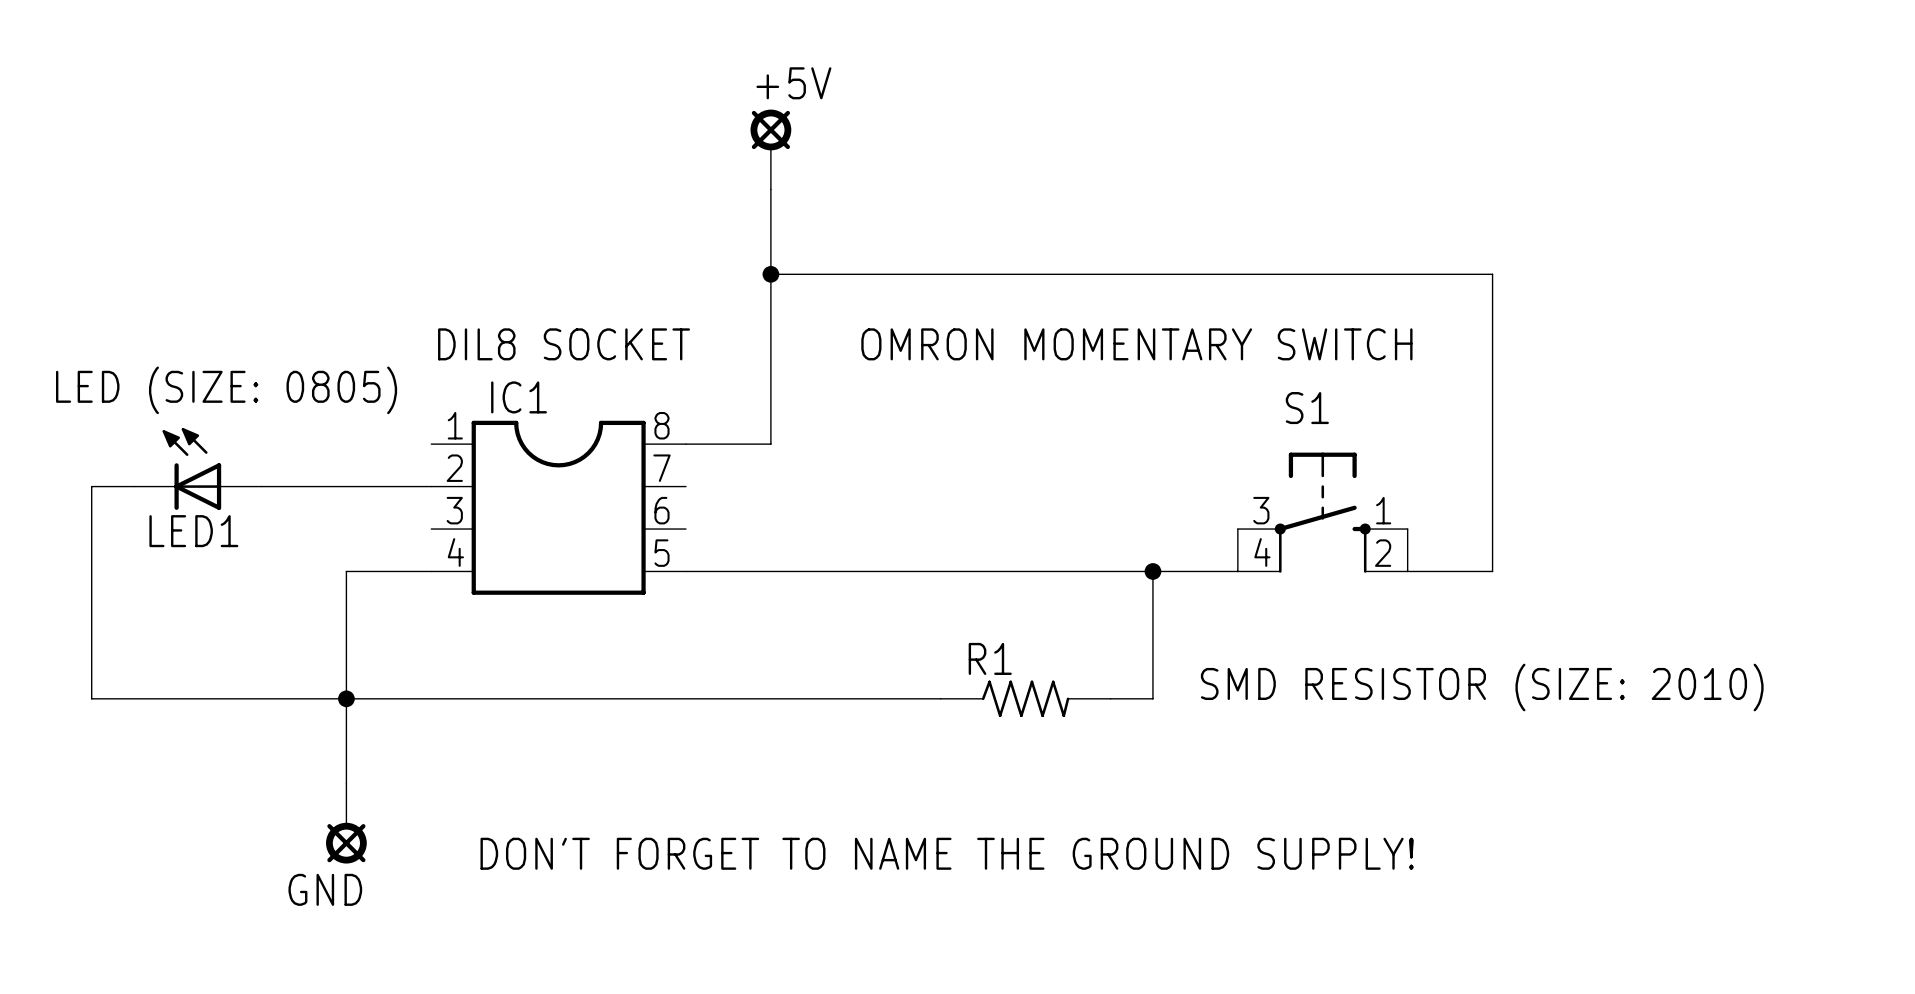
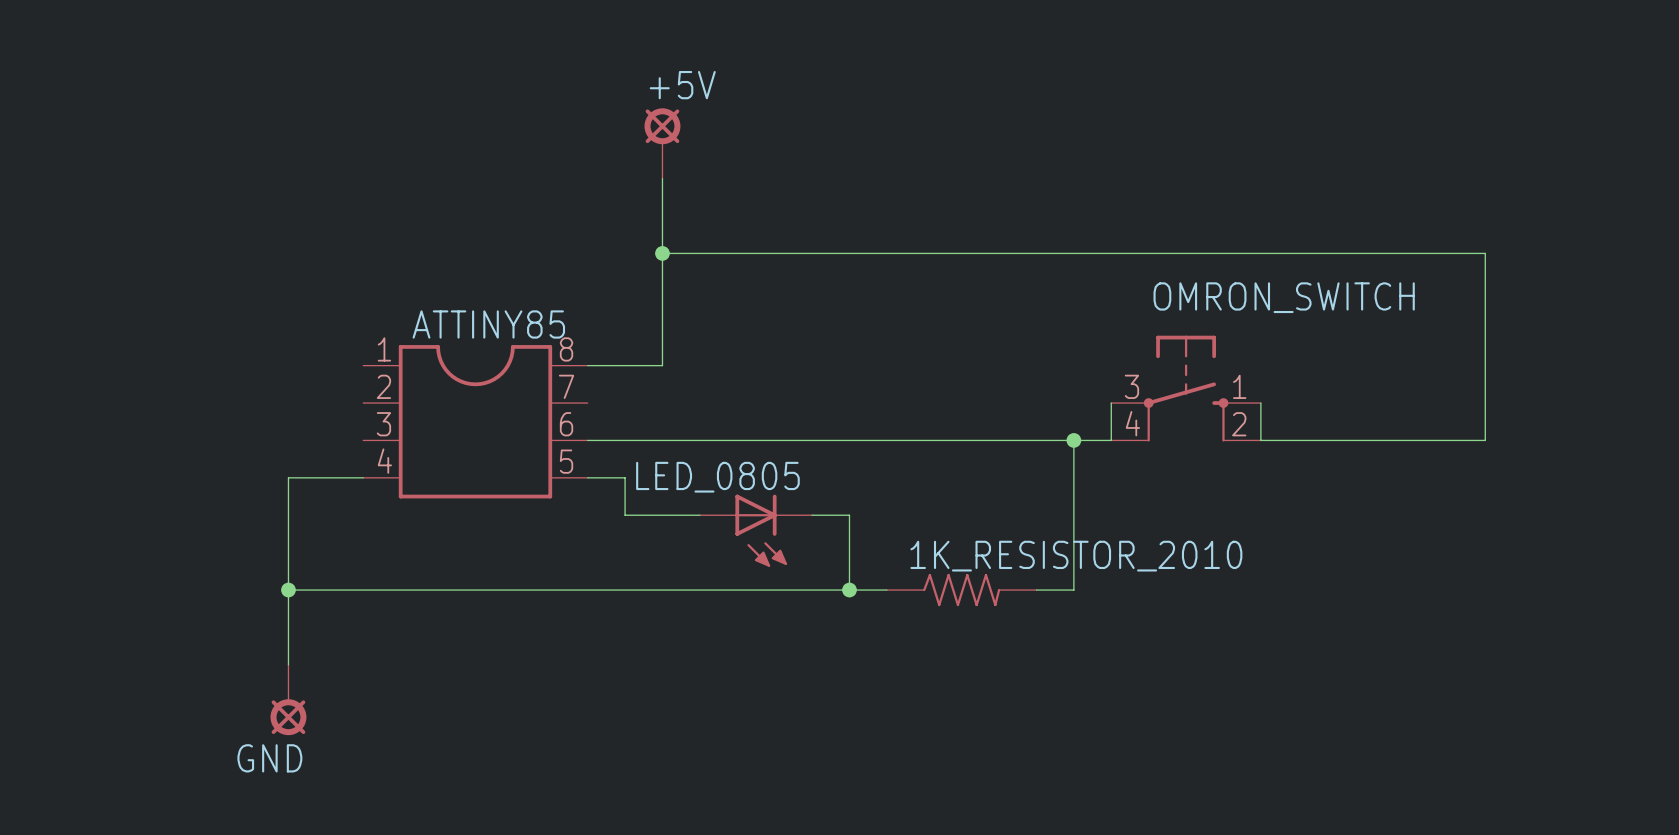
+5V position: (770, 149) -> (662, 143)
wire: (770, 274) (1492, 274) (1492, 571) (1407, 571) (1407, 529) -> none
junction position: (770, 274) -> (662, 253)
wire: none -> (662, 253) (1485, 253) (1485, 440) (1260, 440) (1260, 403)
text: DIL8 SOCKET (564, 344) -> none
text: OMRON MOMENTARY SWITCH (1136, 344) -> none
text: LED (SIZE: 0805) (226, 390) -> none
IC1 name: IC1 (519, 397) -> ATTINY85 (488, 324)
LED1: (197, 468) -> none
OMRON_SWITCH: none -> (1186, 388)
wire: (134, 486) (91, 486) (91, 698) (346, 698) -> none
wire: (261, 486) (431, 486) -> none
wire: none -> (1111, 403) (1111, 440) (587, 440)
S1: (1322, 512) -> none
wire: (728, 571) (1237, 571) -> (625, 477) (625, 515) (699, 515)
wire: (1152, 571) (1152, 698) (1110, 698) -> (1073, 477) (1073, 590) (1036, 590)
junction position: (1152, 571) -> (1073, 440)
wire: none -> (812, 515) (849, 515) (849, 590)
LED_0805: none -> (755, 530)
text: SMD RESISTOR (SIZE: 2010) (1482, 687) -> none
junction: none -> (849, 590)
R1: (1025, 698) -> none
1K_RESISTOR_2010: none -> (961, 590)
text: DON'T FORGET TO NAME THE GROUND SUPPLY! (947, 853) -> none

